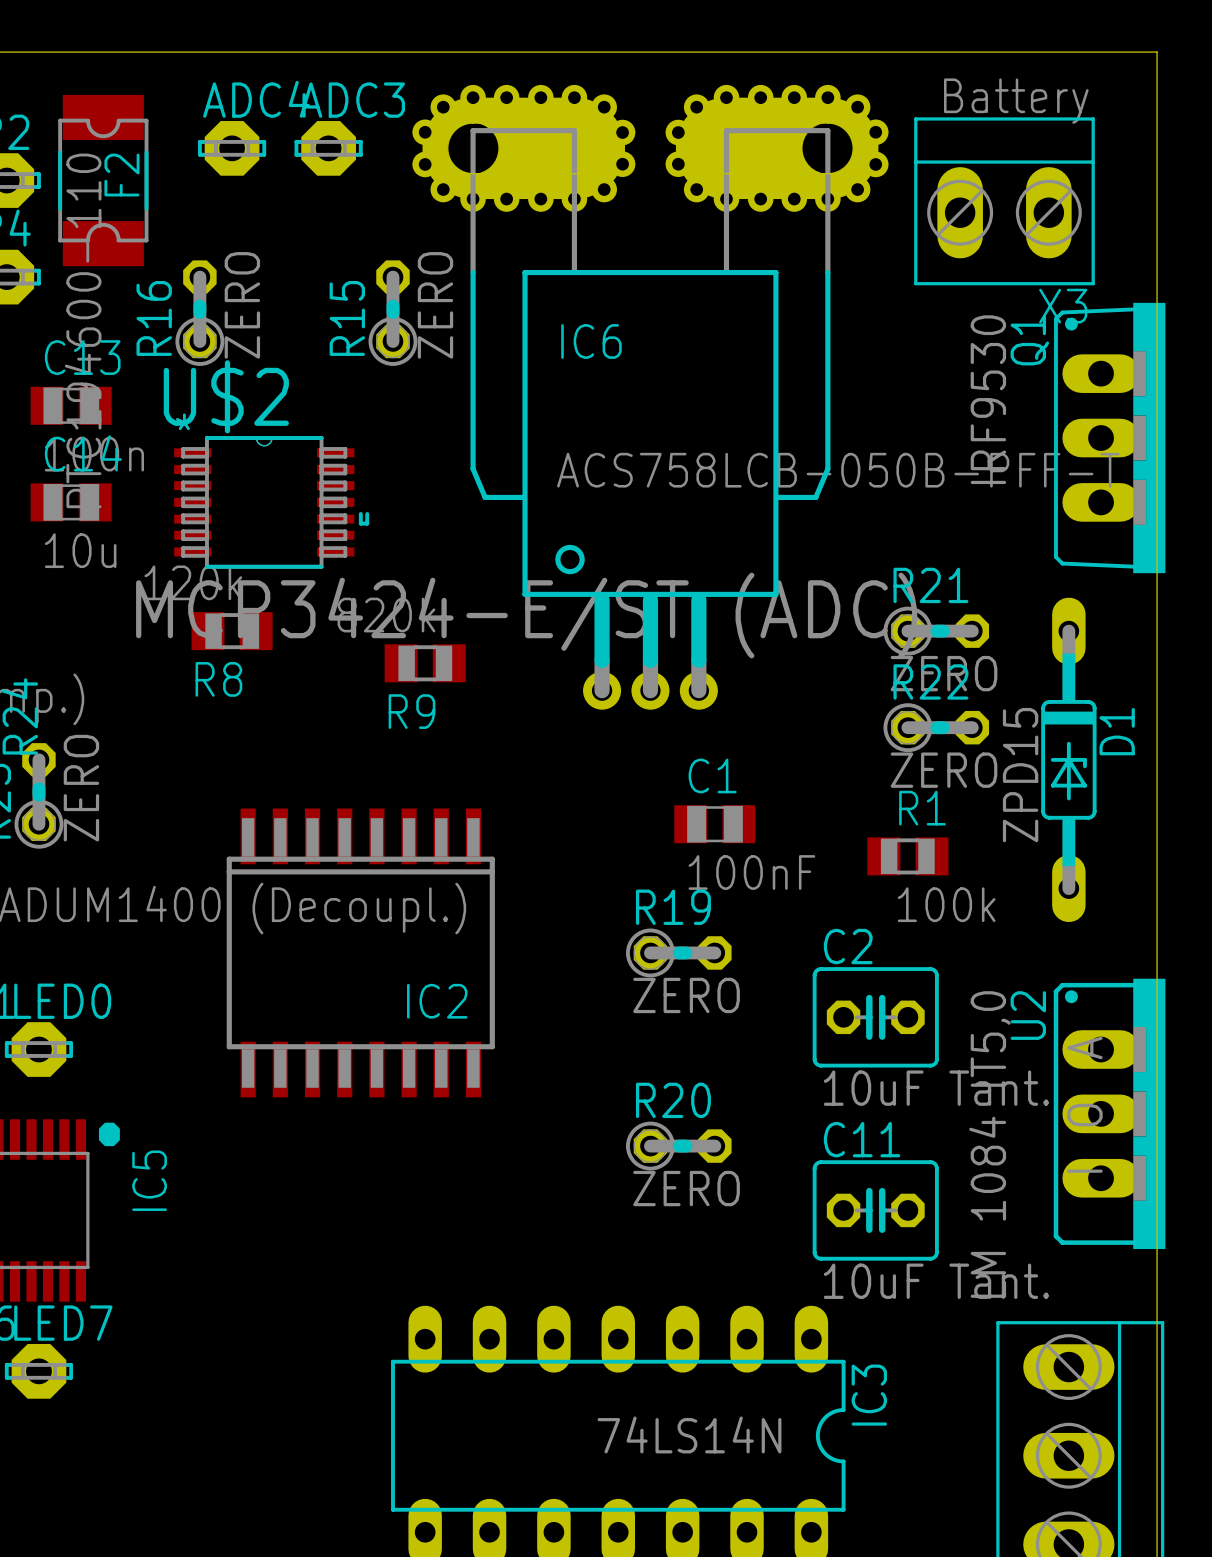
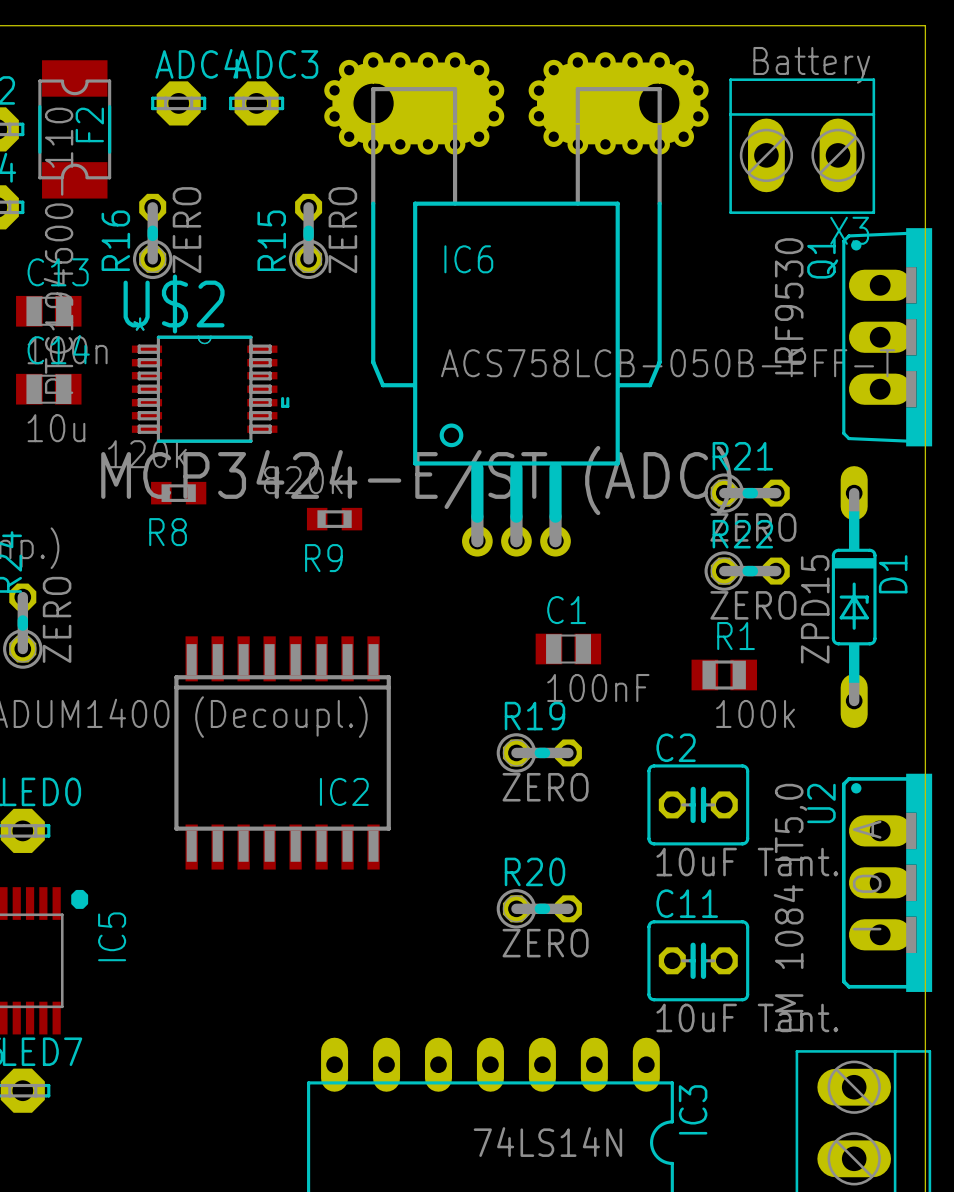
R8 footprint: [191, 612, 273, 651] -> [151, 481, 207, 505]
R9 footprint: [384, 644, 466, 683] -> [306, 507, 363, 531]

